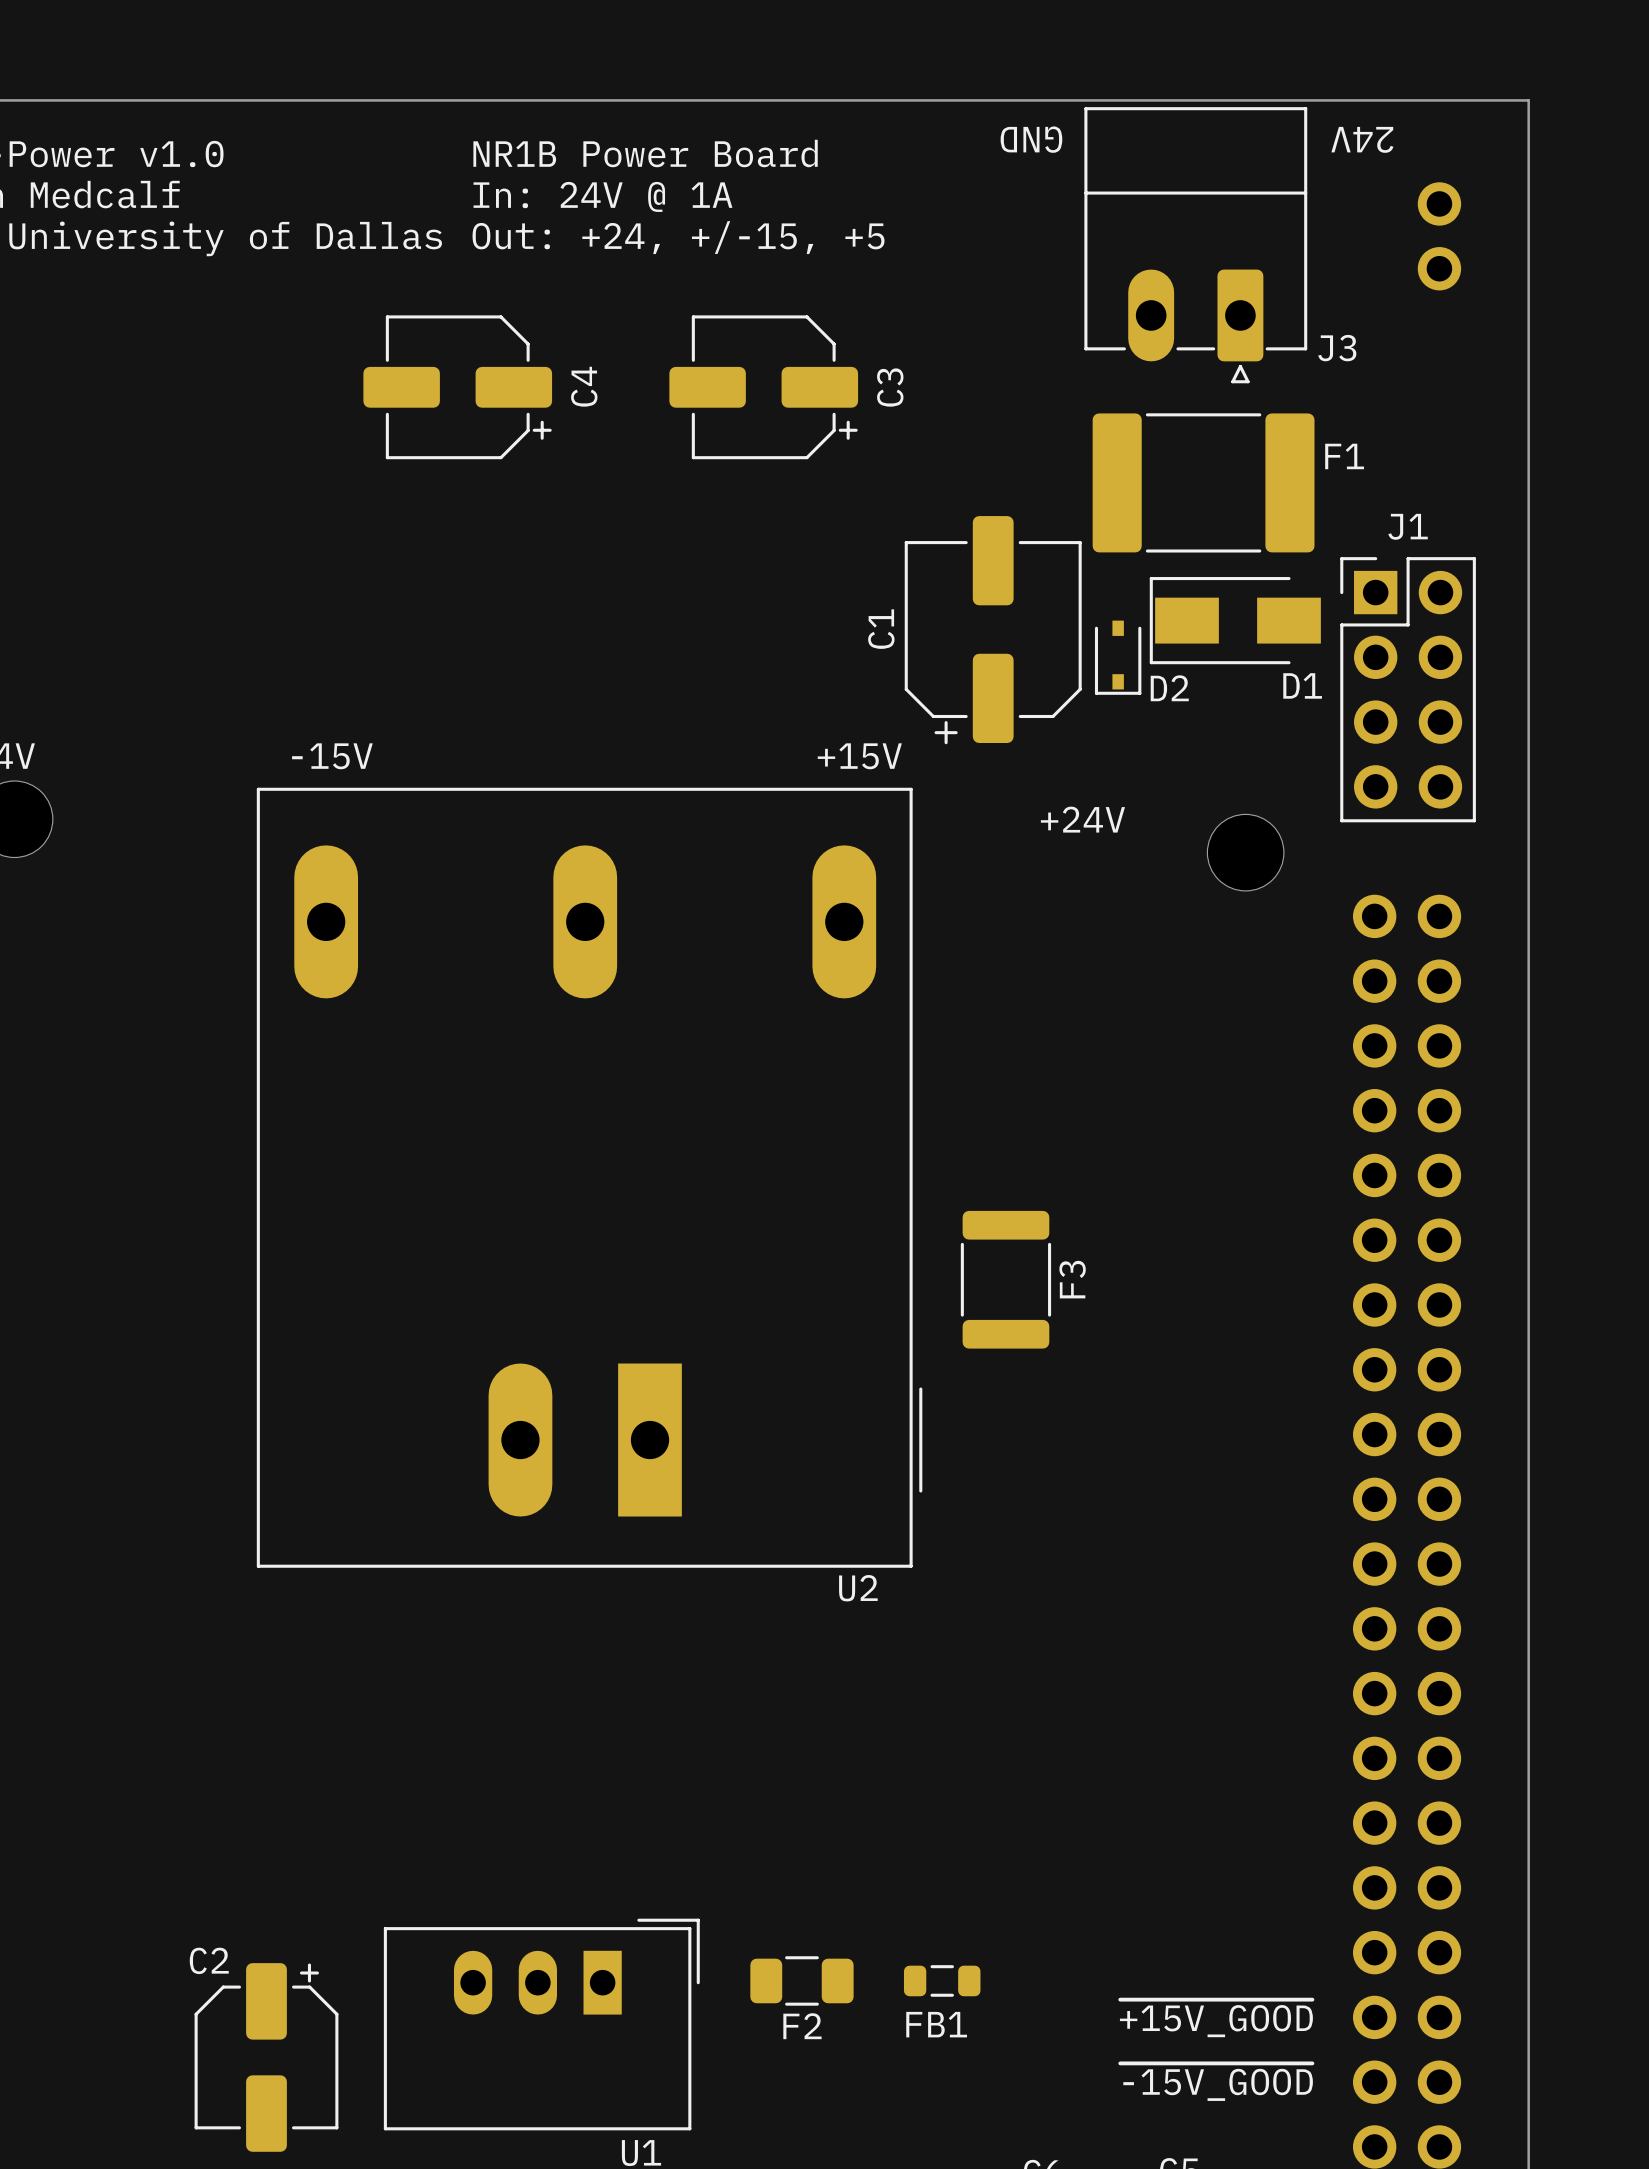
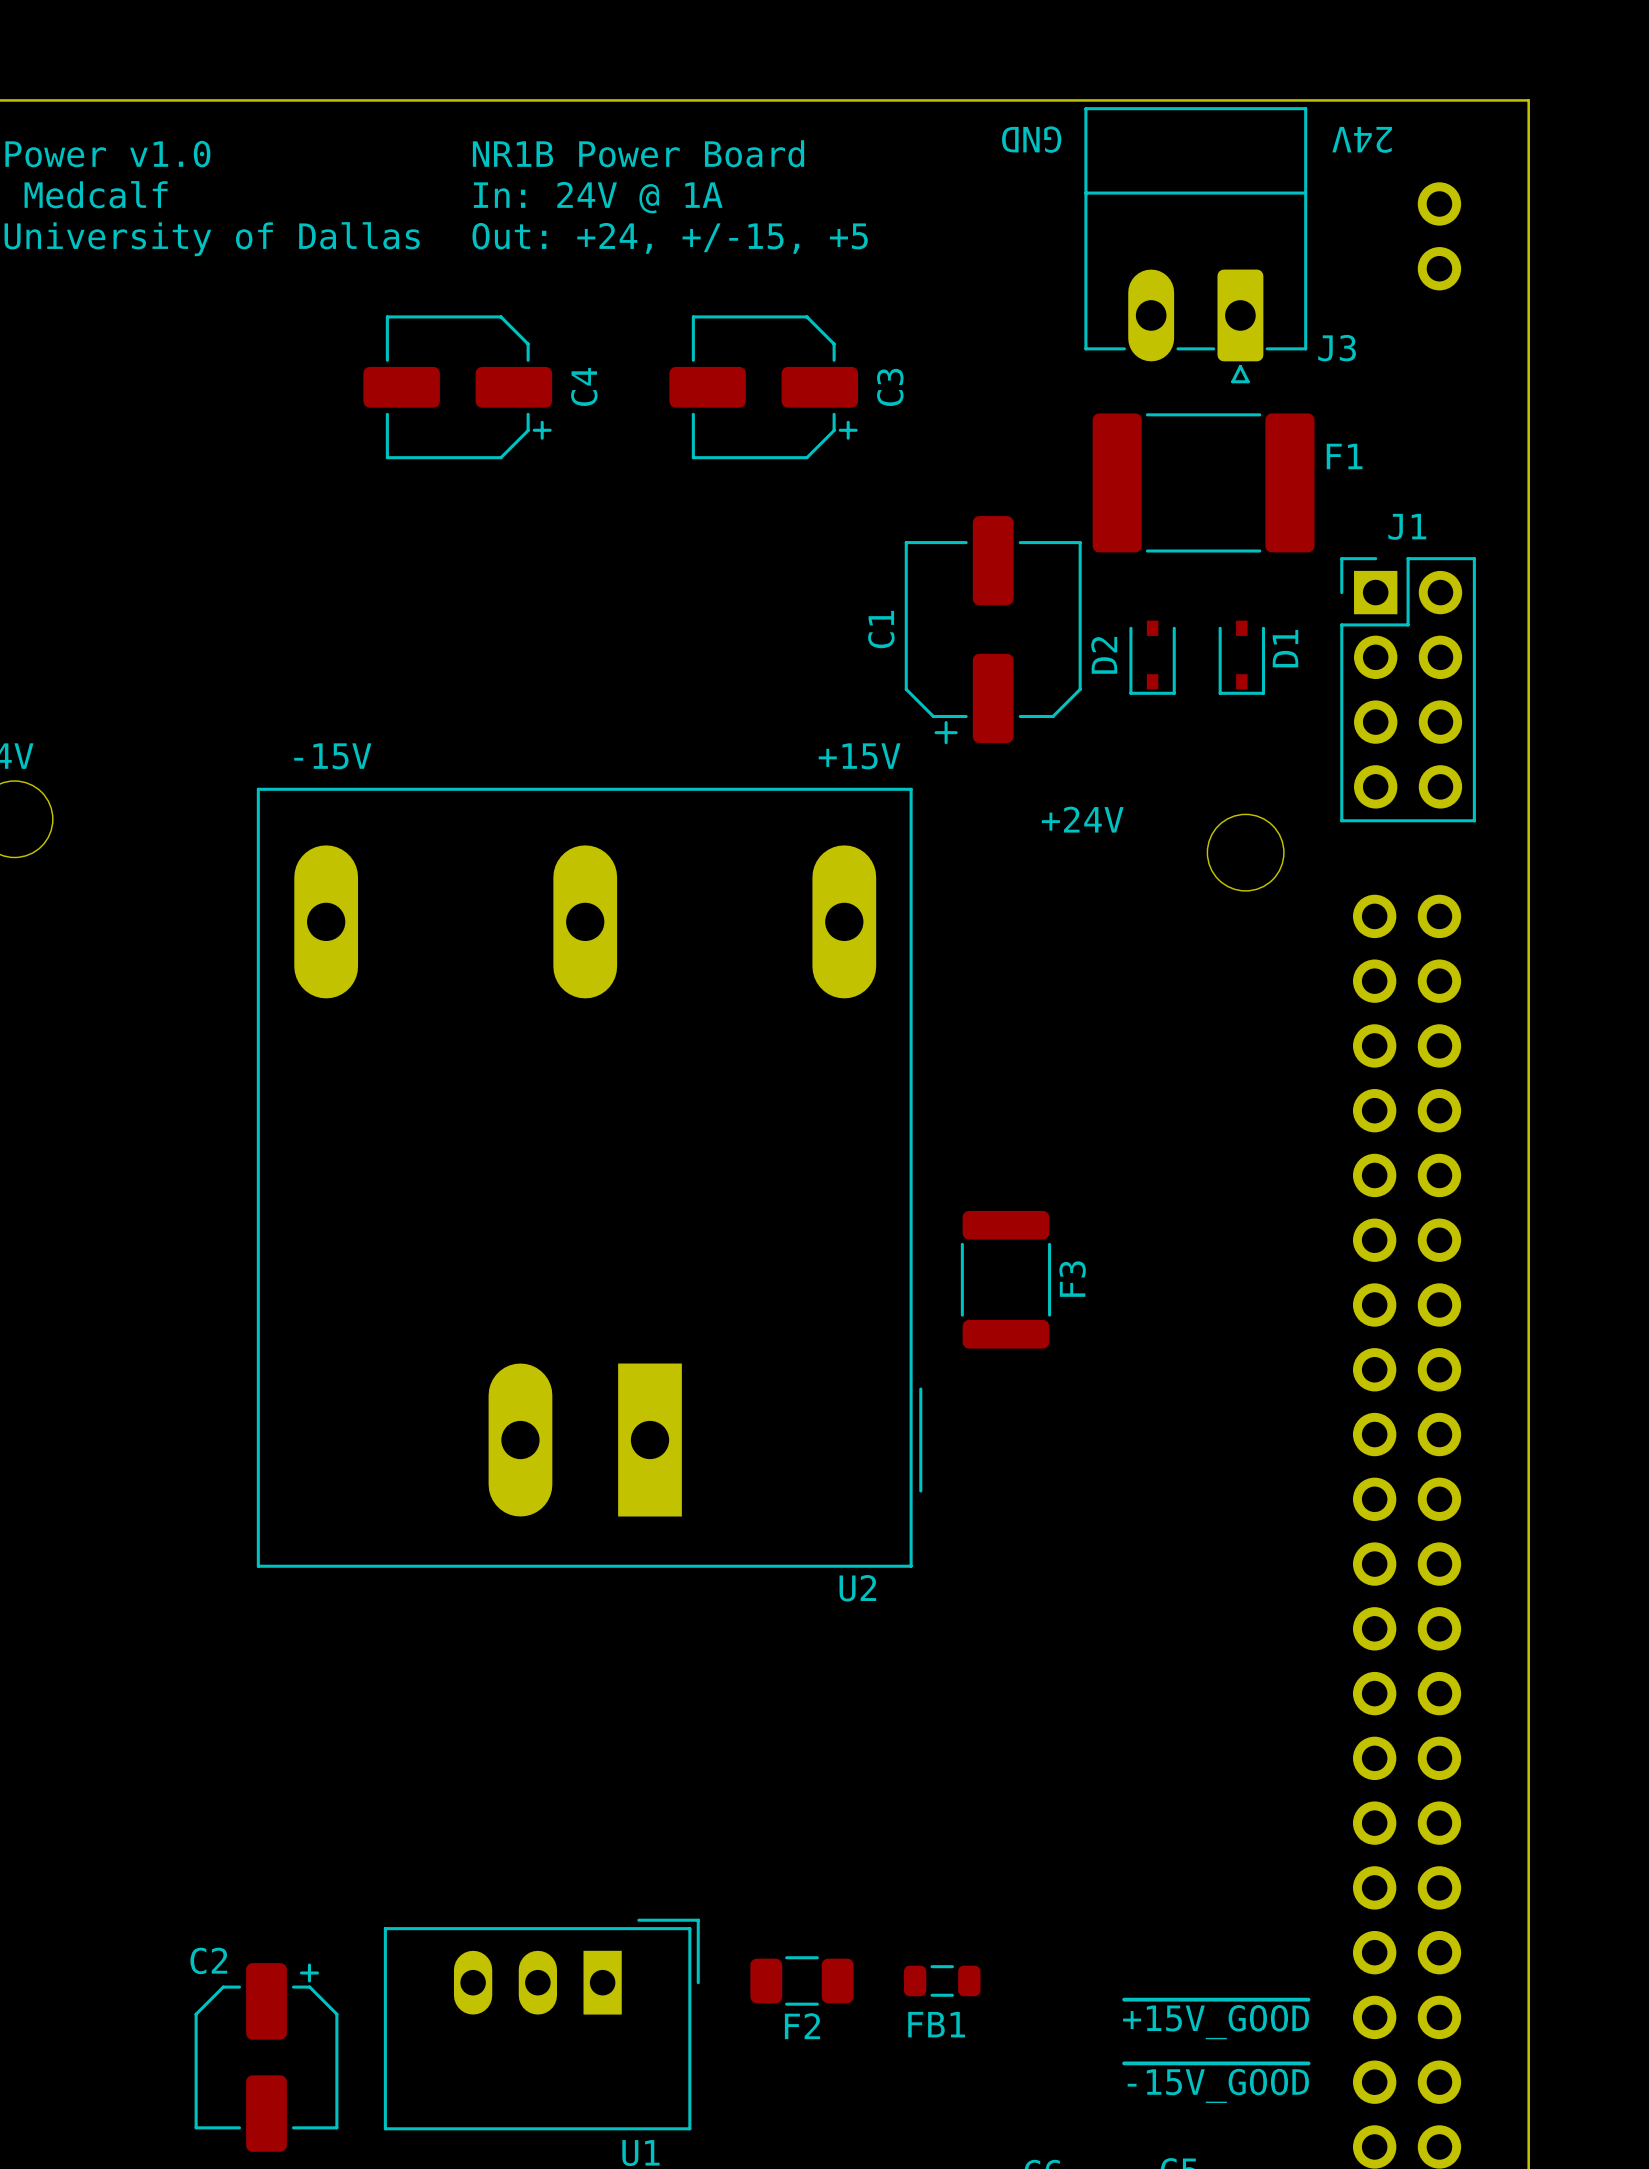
D1 footprint: [1149, 577, 1321, 665] -> [1218, 620, 1266, 695]
D2 position: (1118, 657) -> (1152, 657)
D1 name position: D1 (1302, 685) -> D1 (1285, 648)
D2 name rotation: 0° (1169, 688) -> 90° counterclockwise (1104, 655)
D2 name position: D2 (1169, 688) -> D2 (1104, 655)

